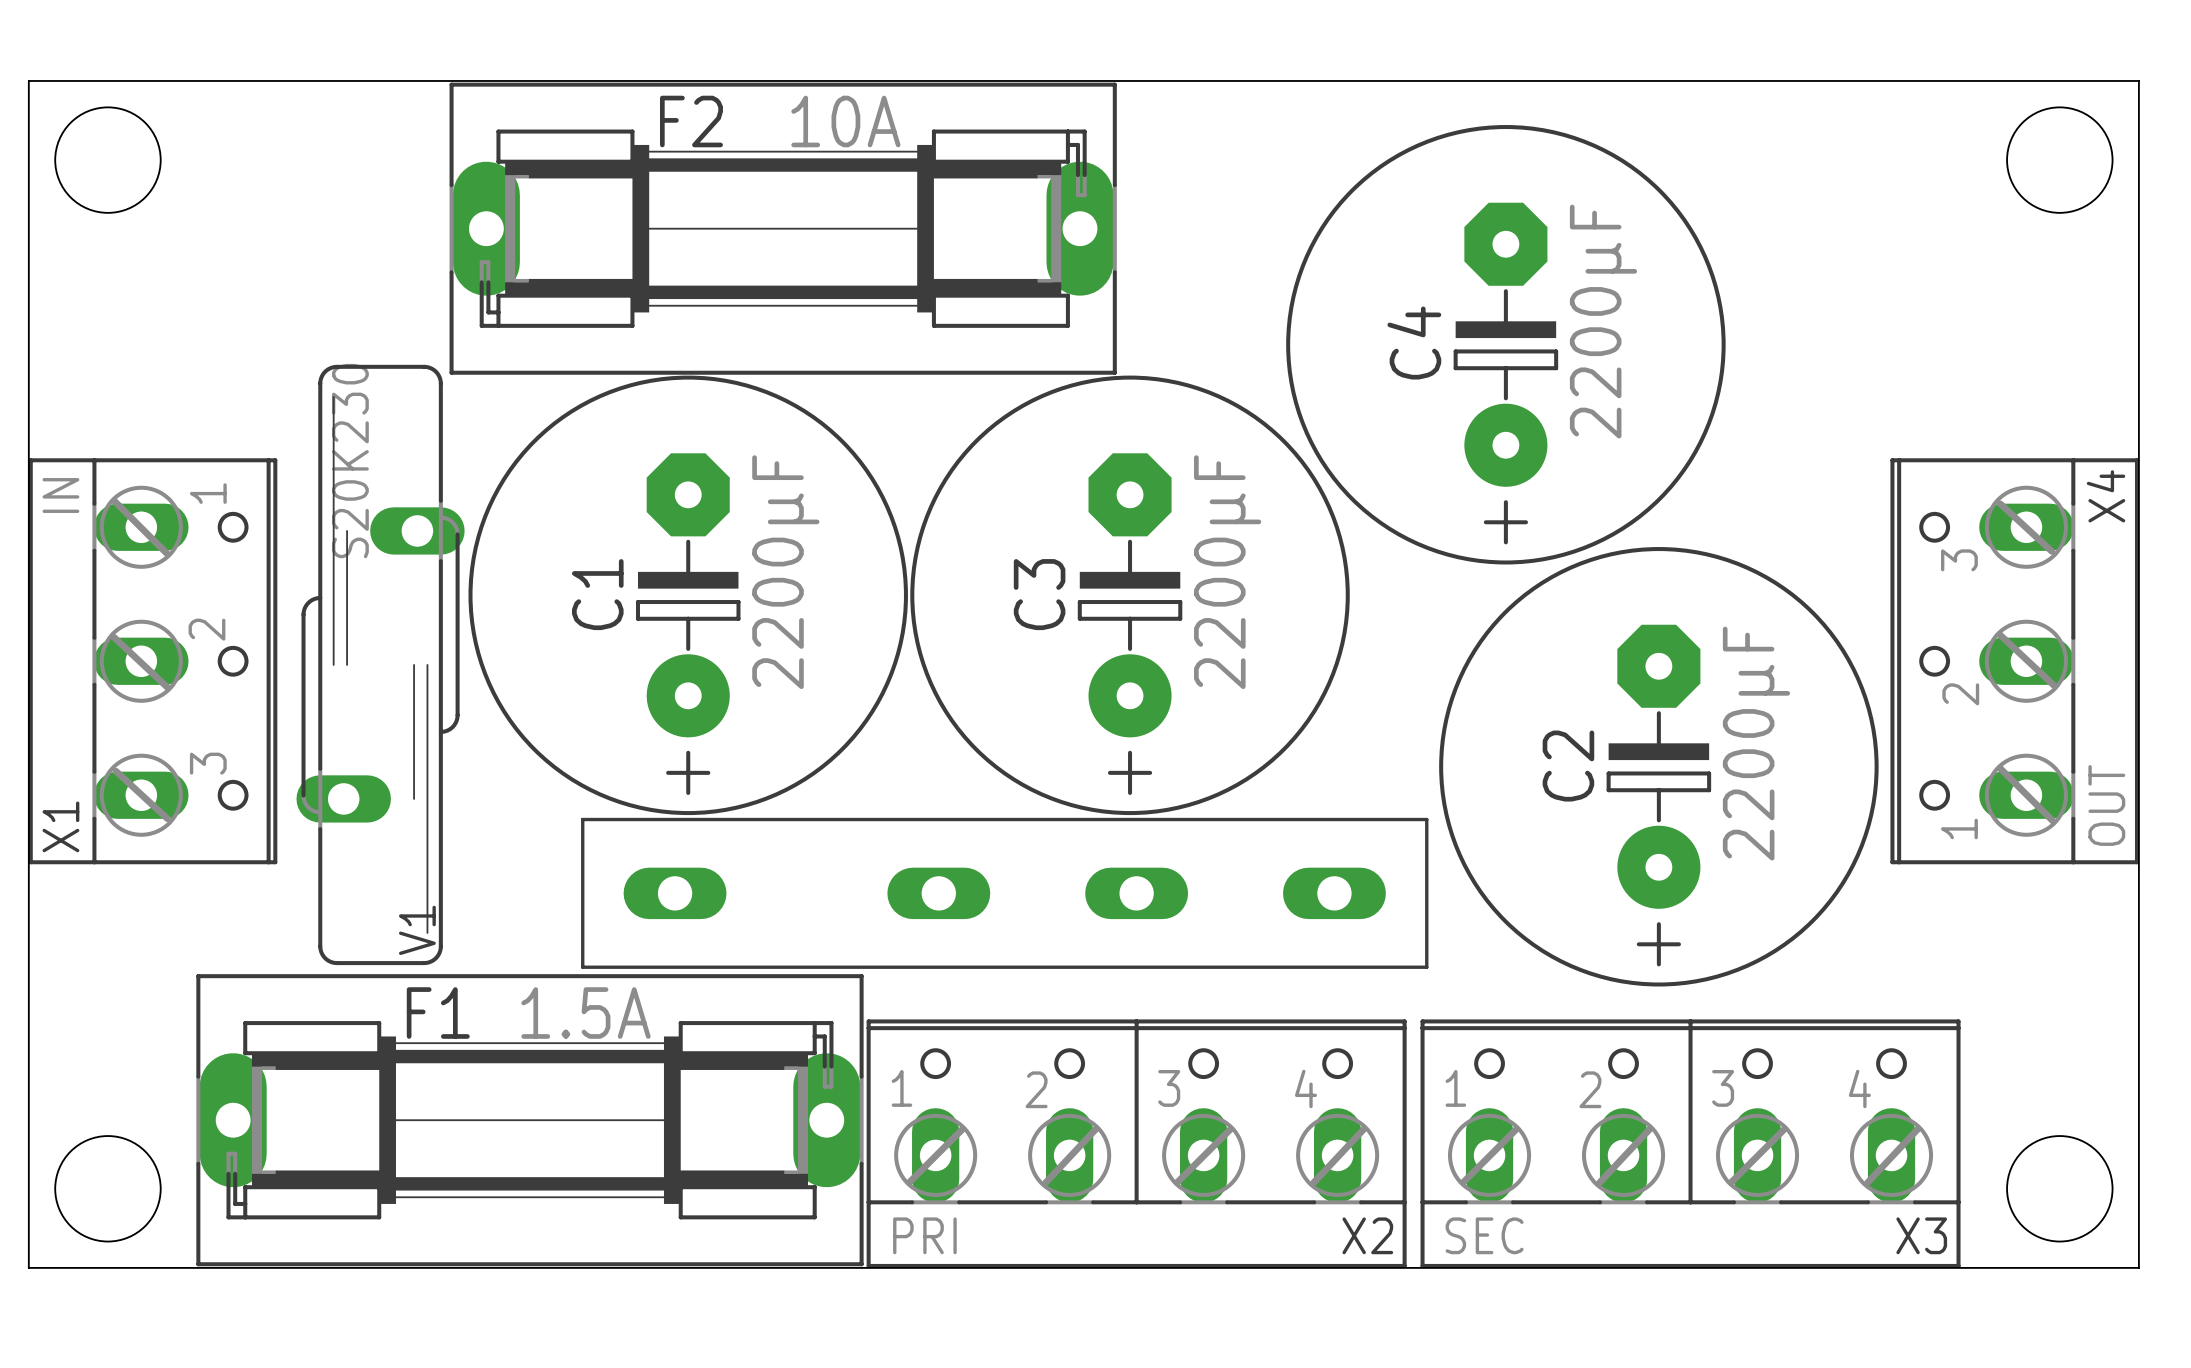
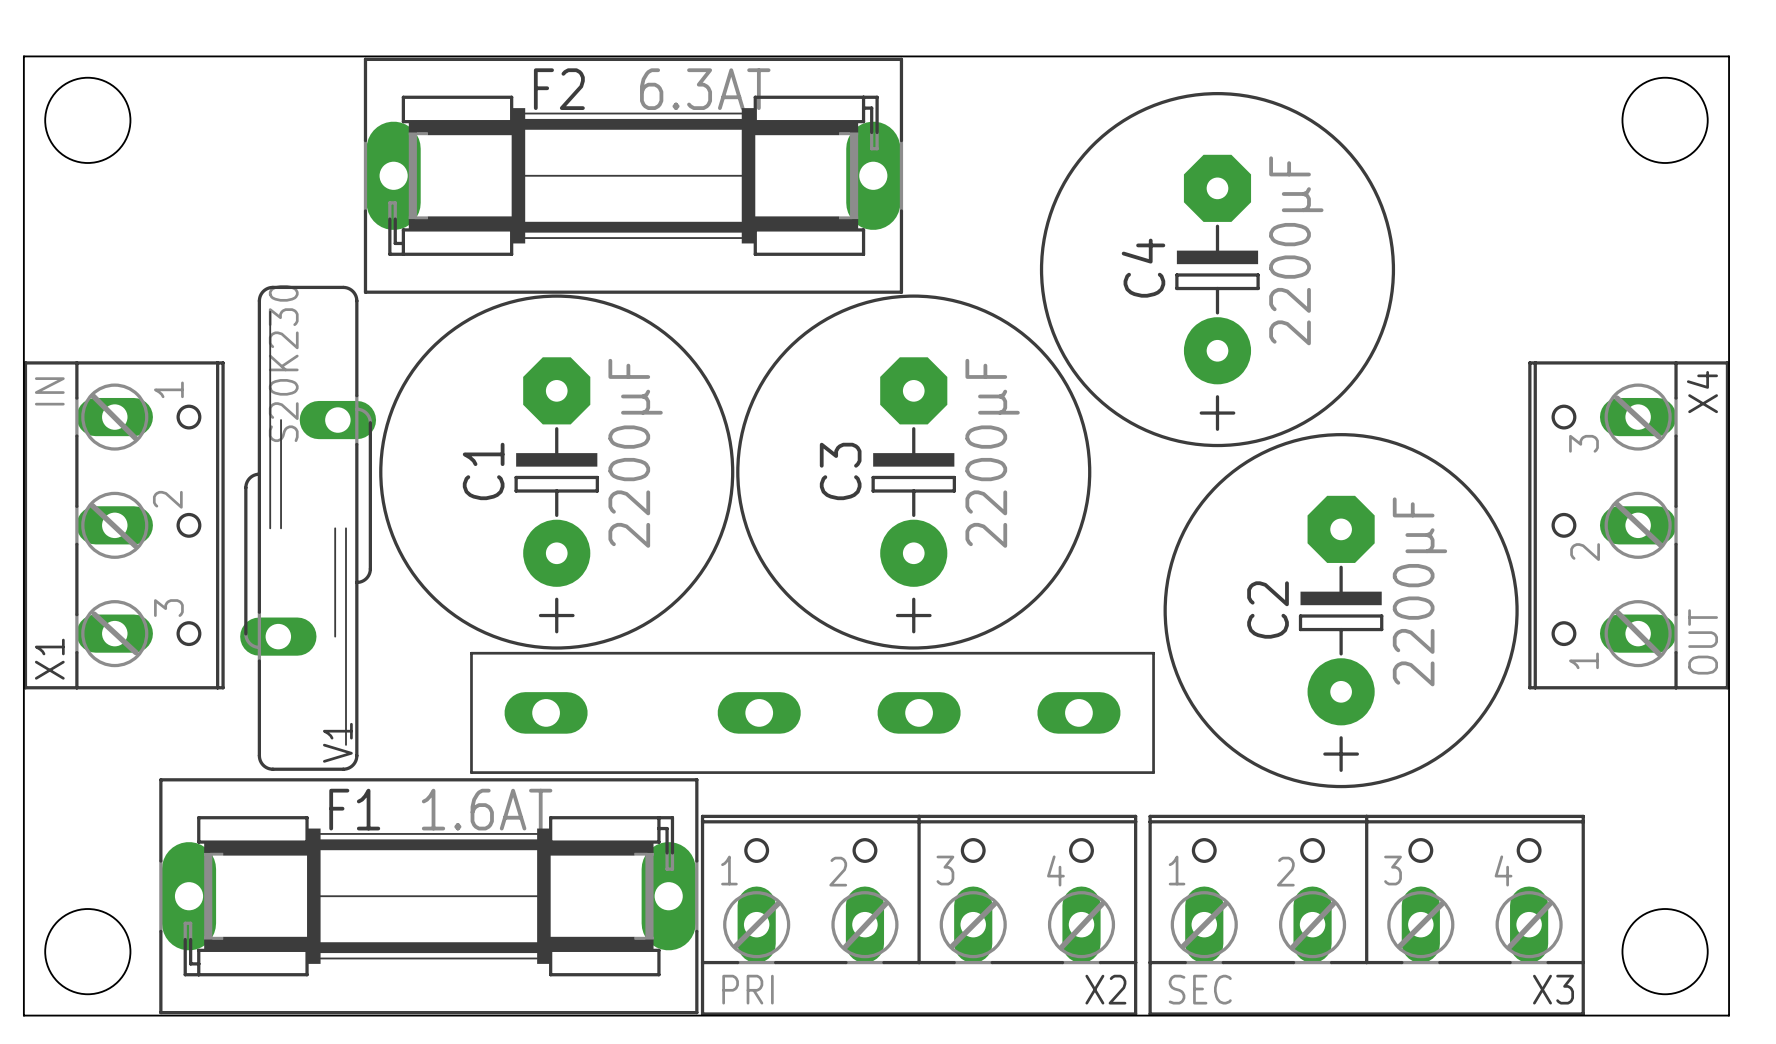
F2 value: 10A (845, 121) -> 6.3AT (705, 89)
F1 value: 1.5A (585, 1013) -> 1.6AT (487, 809)

